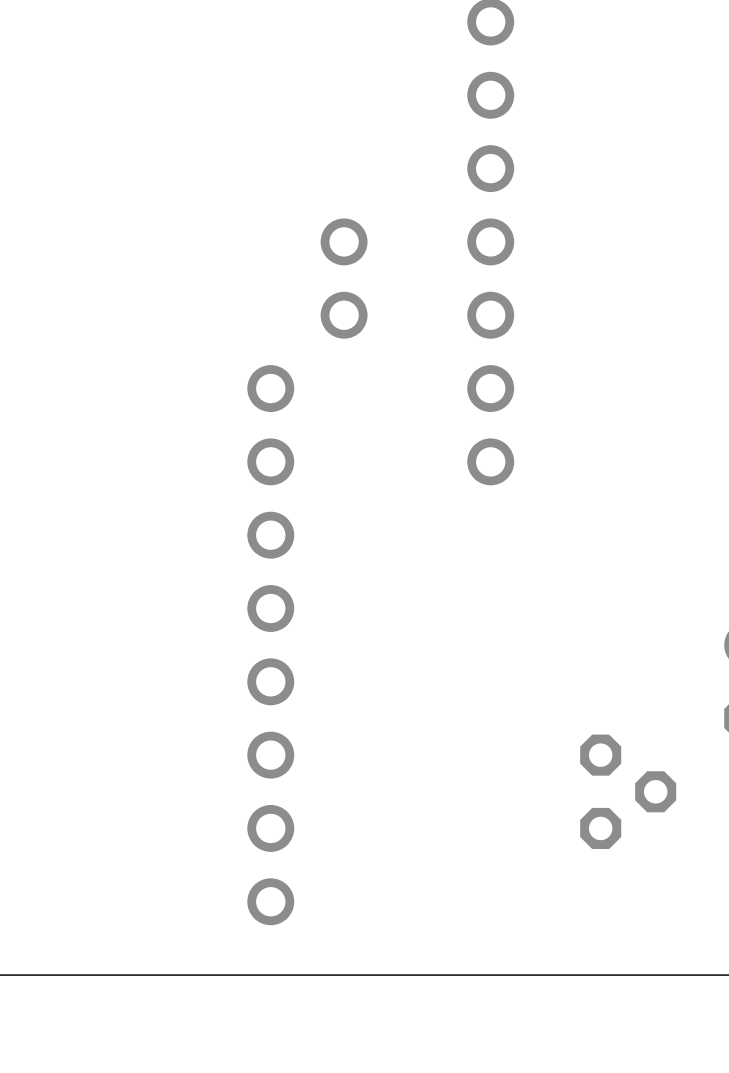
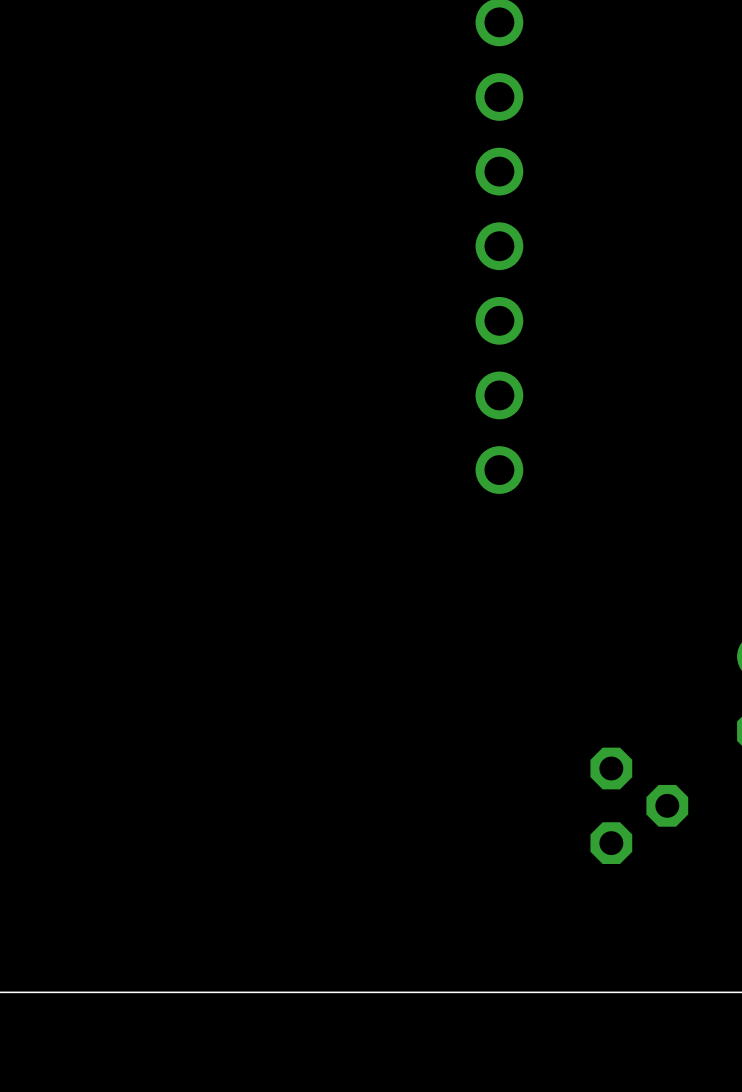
part: (344, 241) -> none
part: (344, 315) -> none
part: (270, 388) -> none
part: (270, 461) -> none
part: (270, 535) -> none
part: (270, 608) -> none
part: (270, 681) -> none
part: (270, 755) -> none
part: (270, 828) -> none
part: (270, 901) -> none

